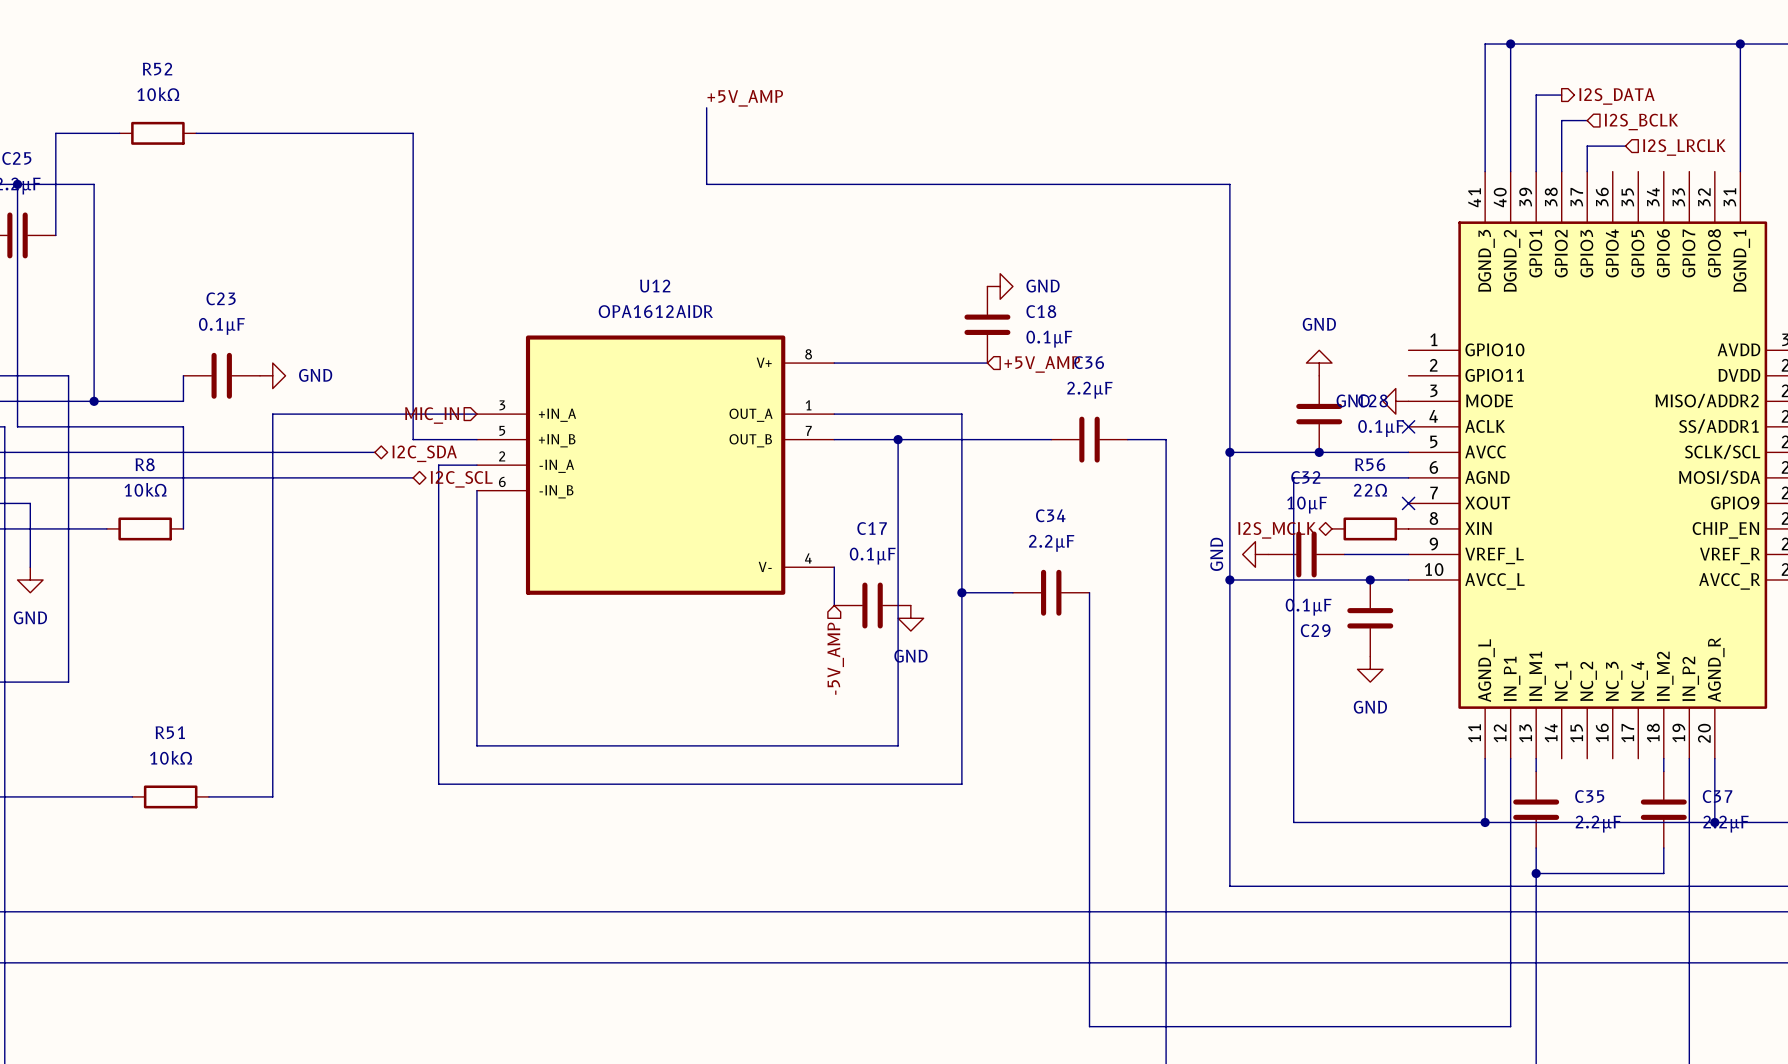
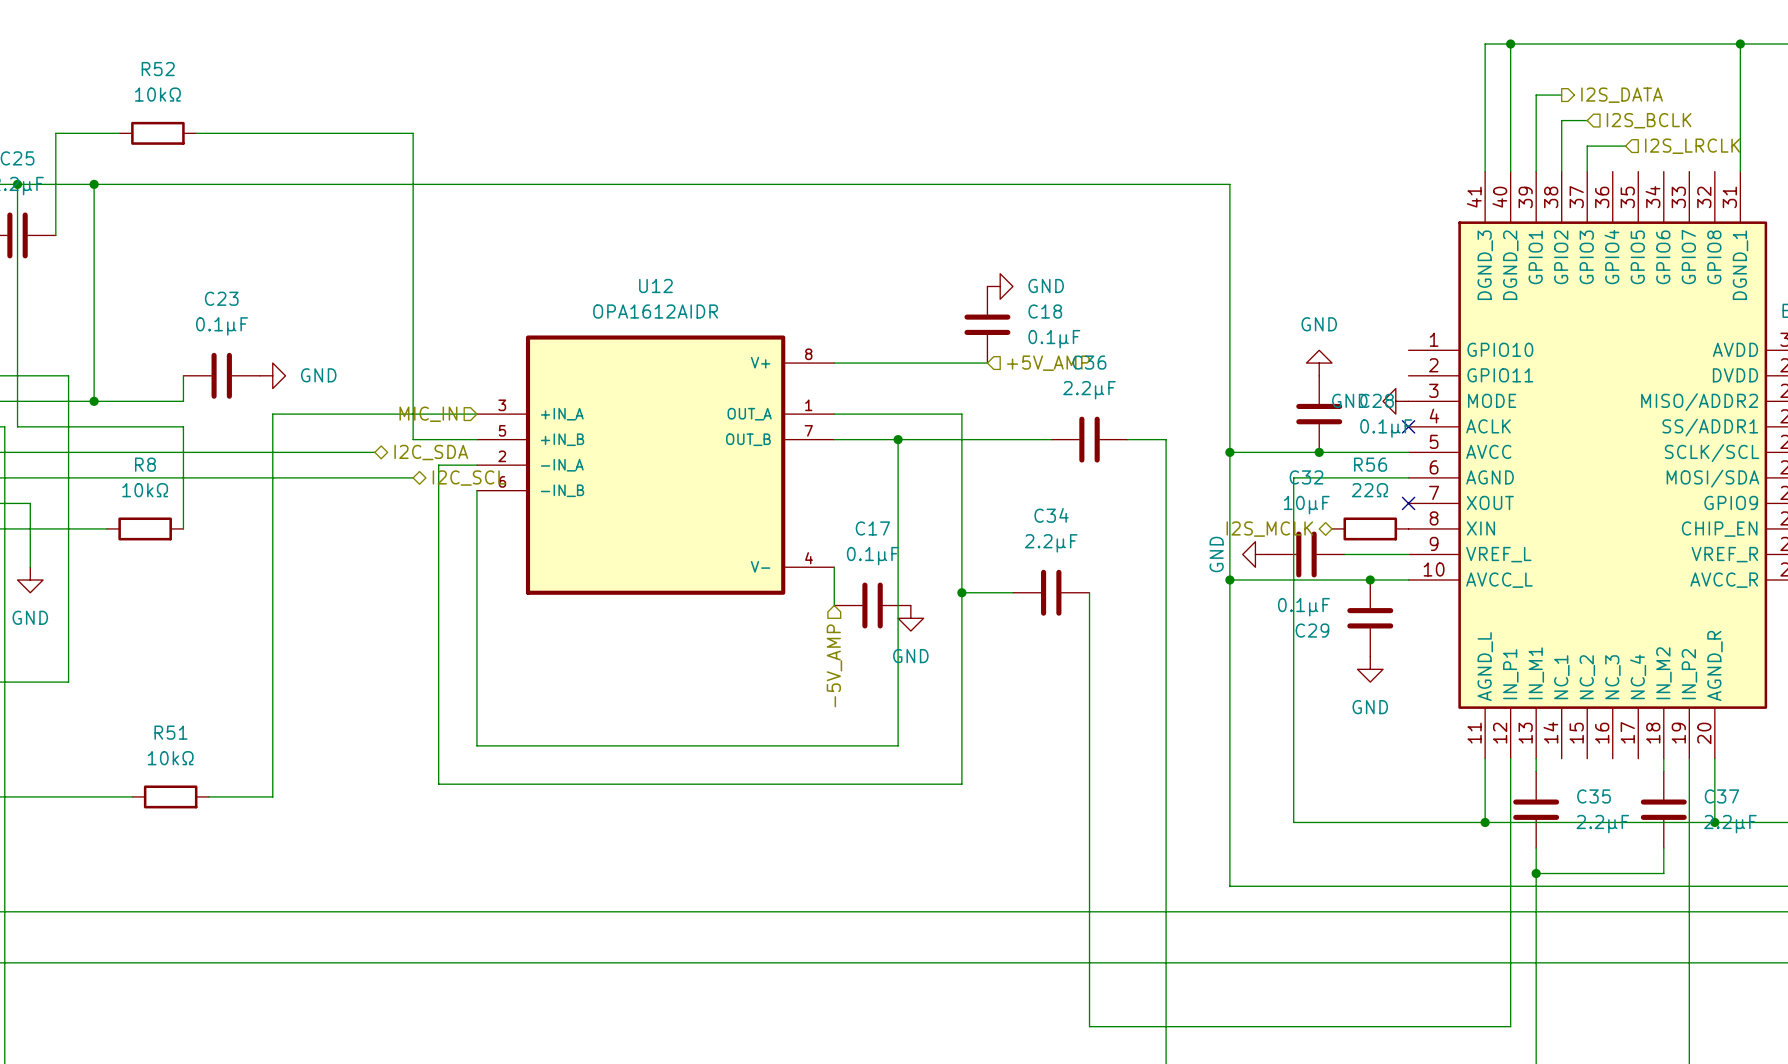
label: +5V_AMP (745, 98) -> none
wire: (706, 107) (706, 184) -> (94, 184) (706, 184)
junction: none -> (94, 184)

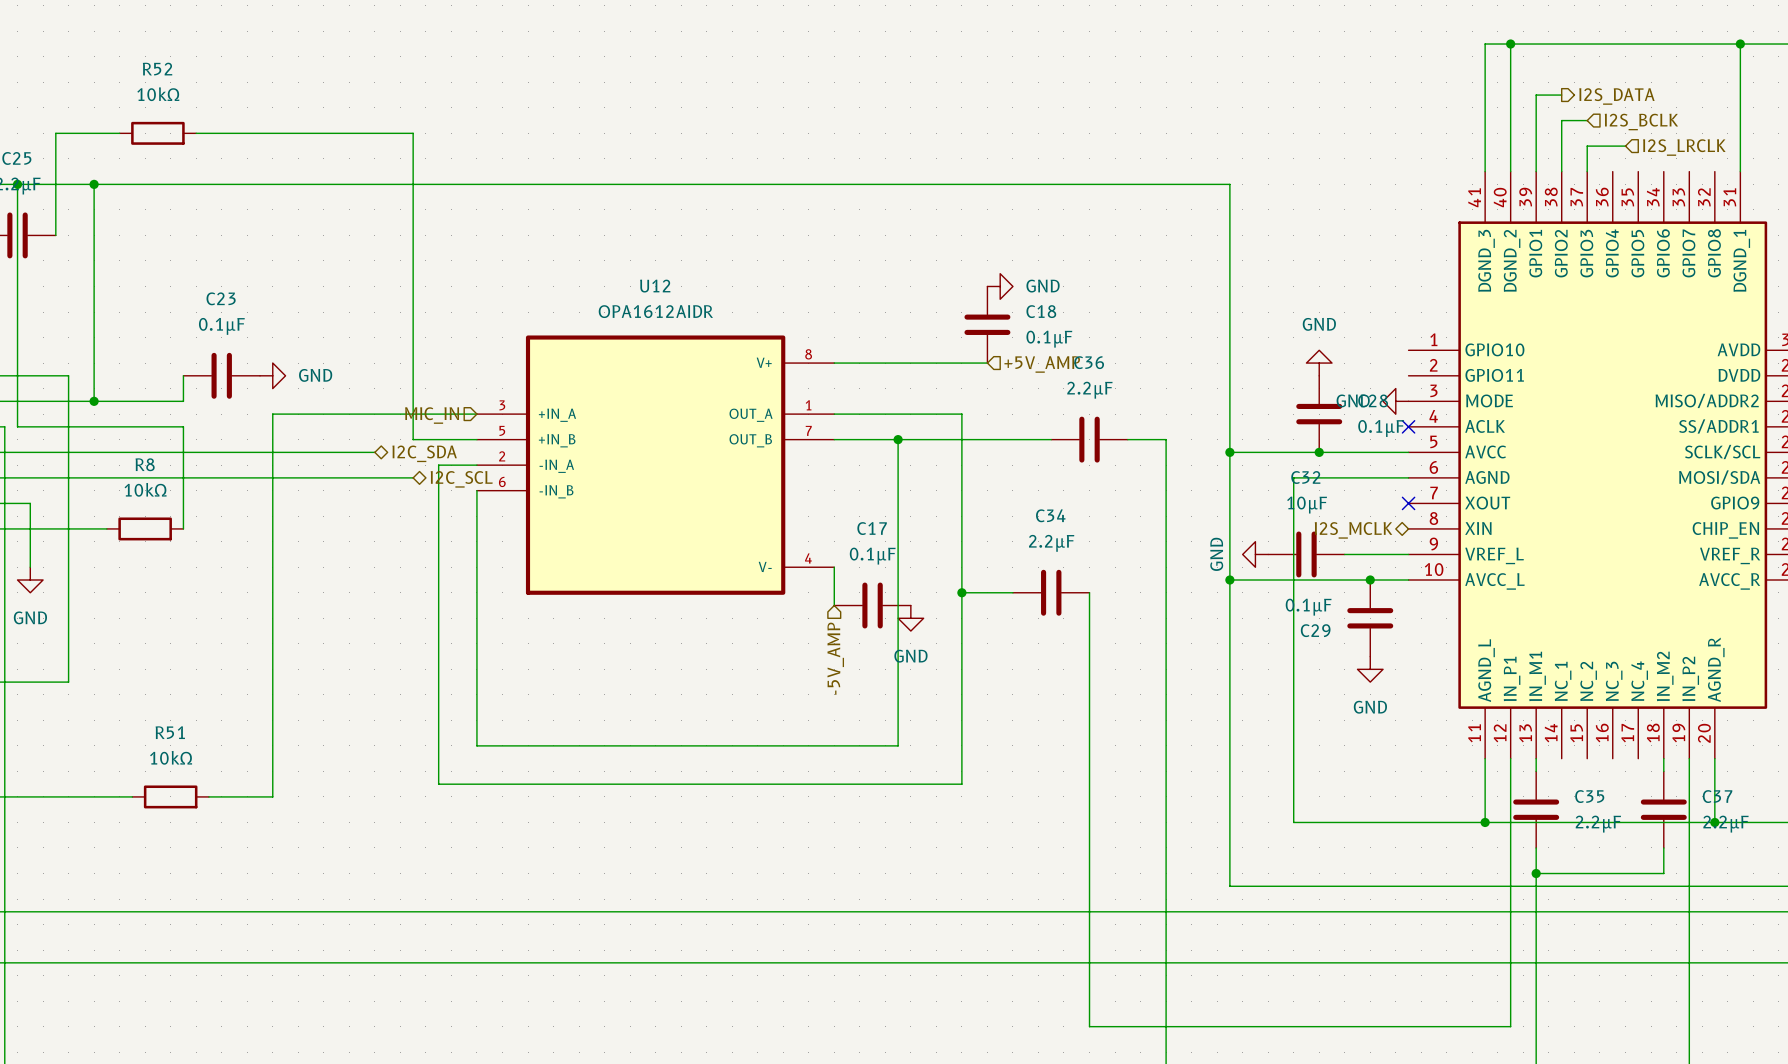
R56: 22Ω (1370, 528) -> none
hierarchical label position: I2S_MCLK (1269, 529) -> I2S_MCLK (1353, 530)

